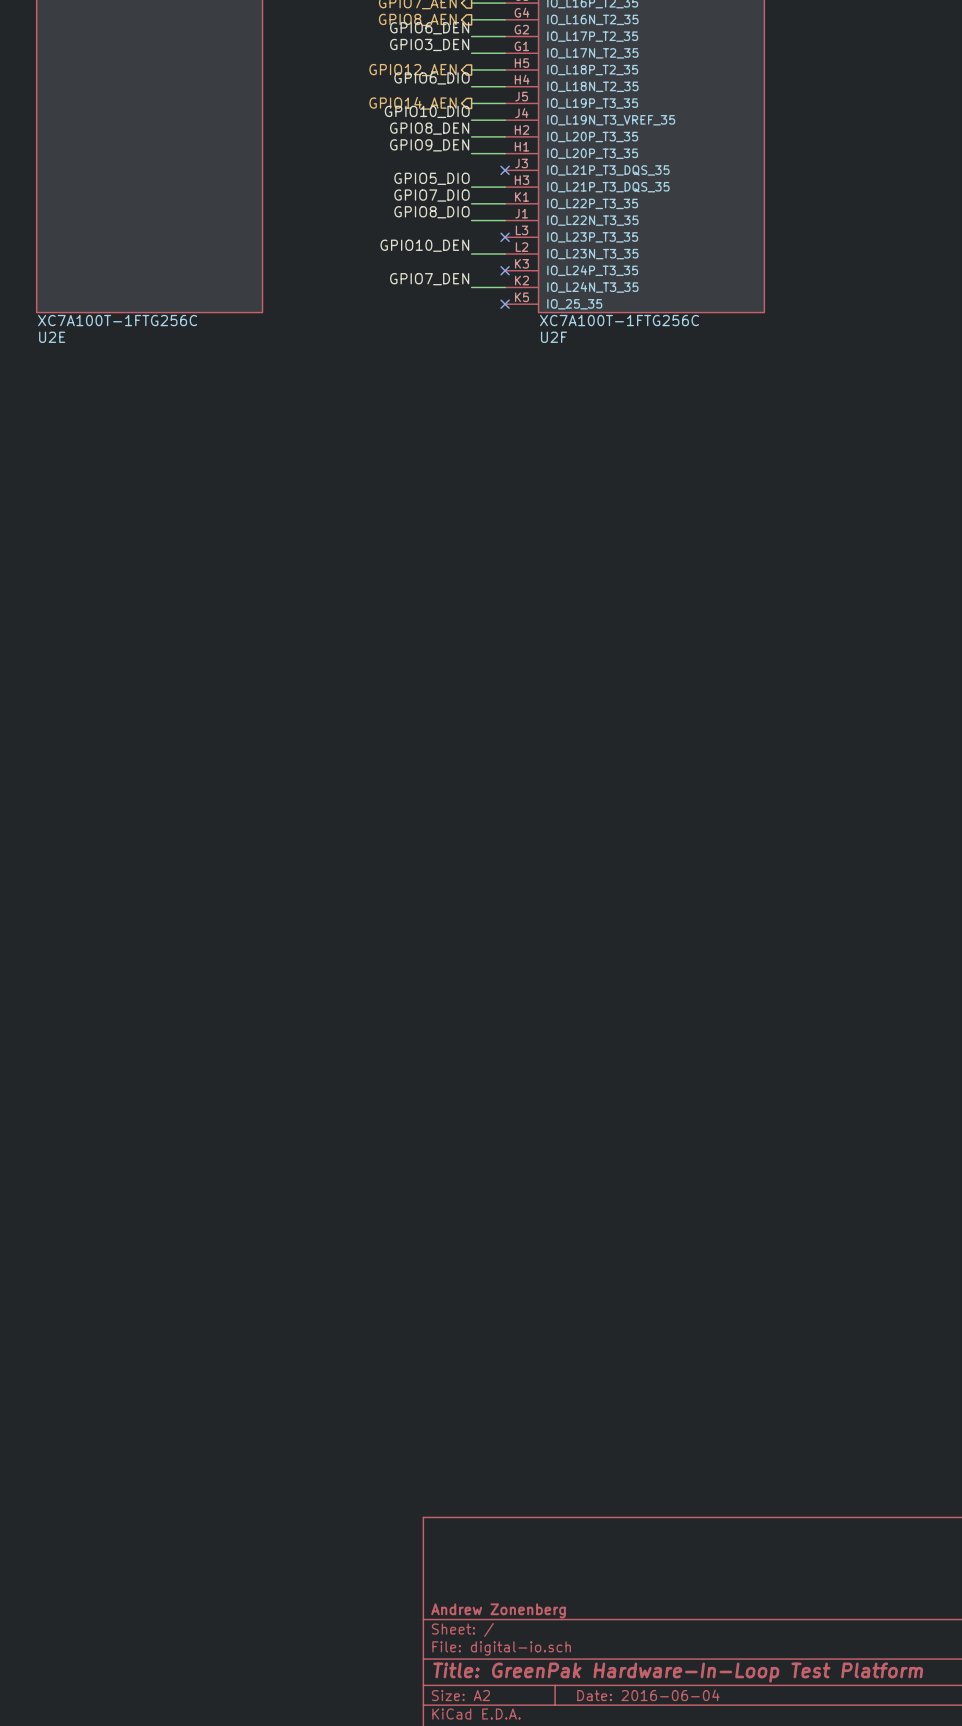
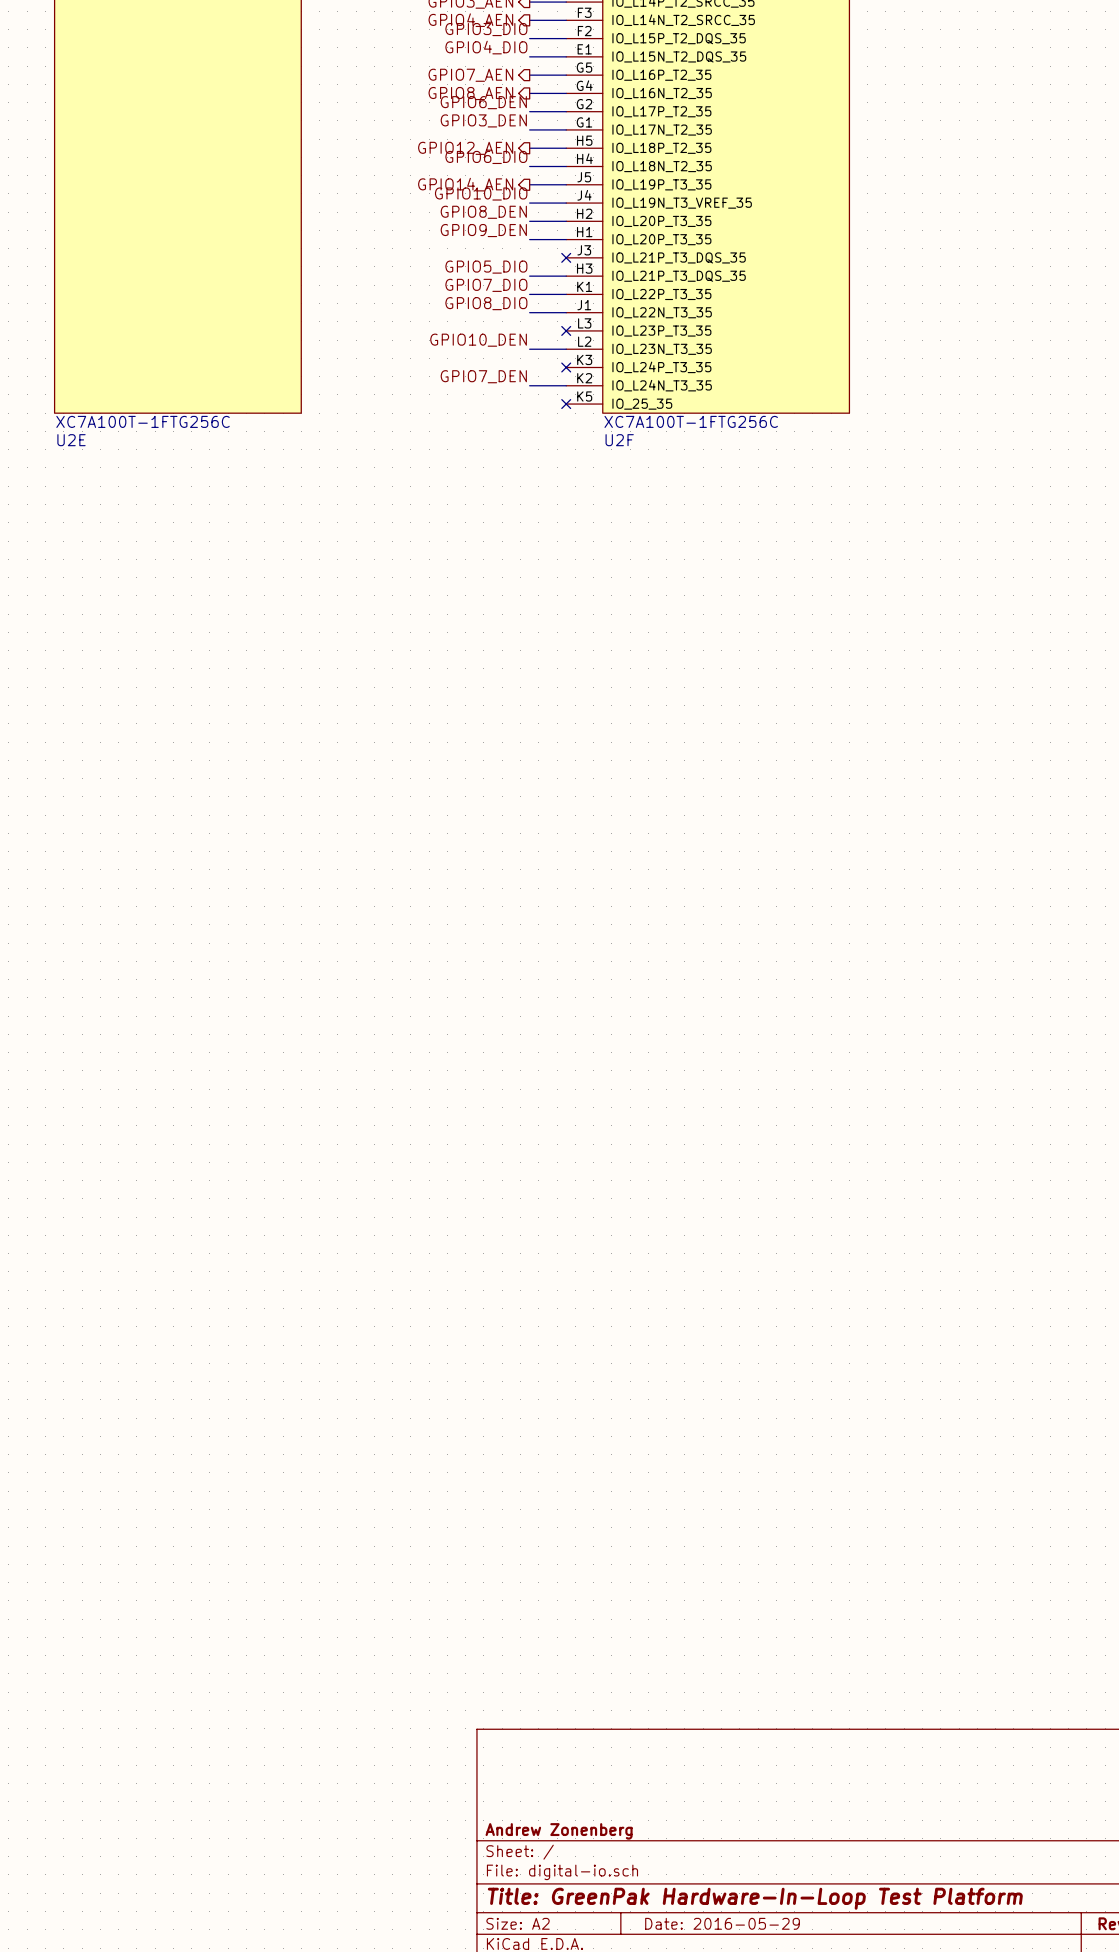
title block: Date: 2016-06-04 (648, 1695) -> Date: 2016-05-29 (722, 1923)

